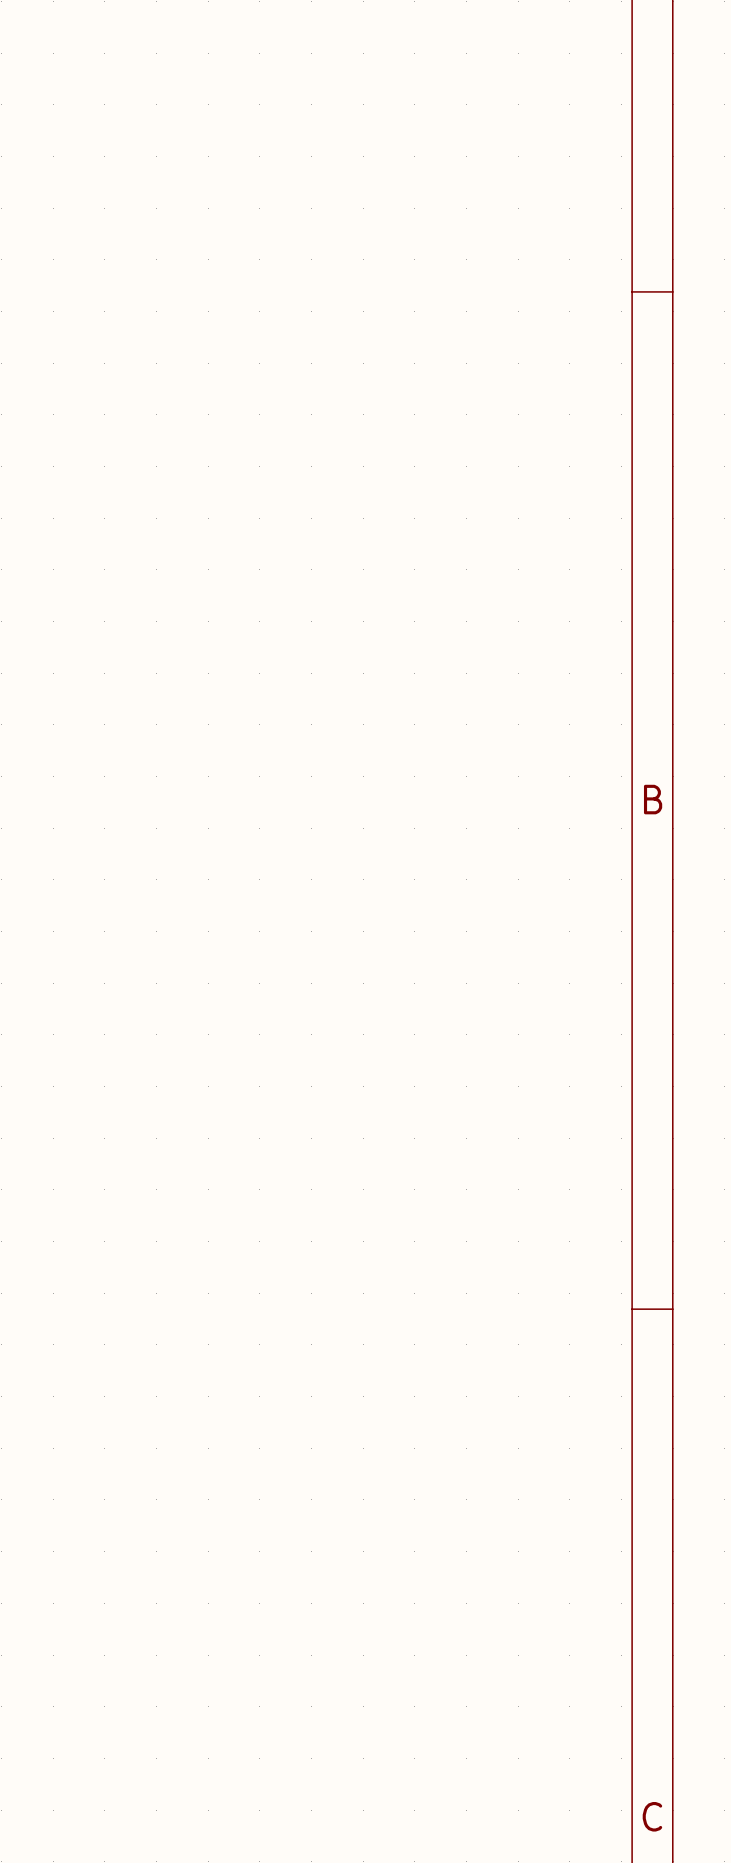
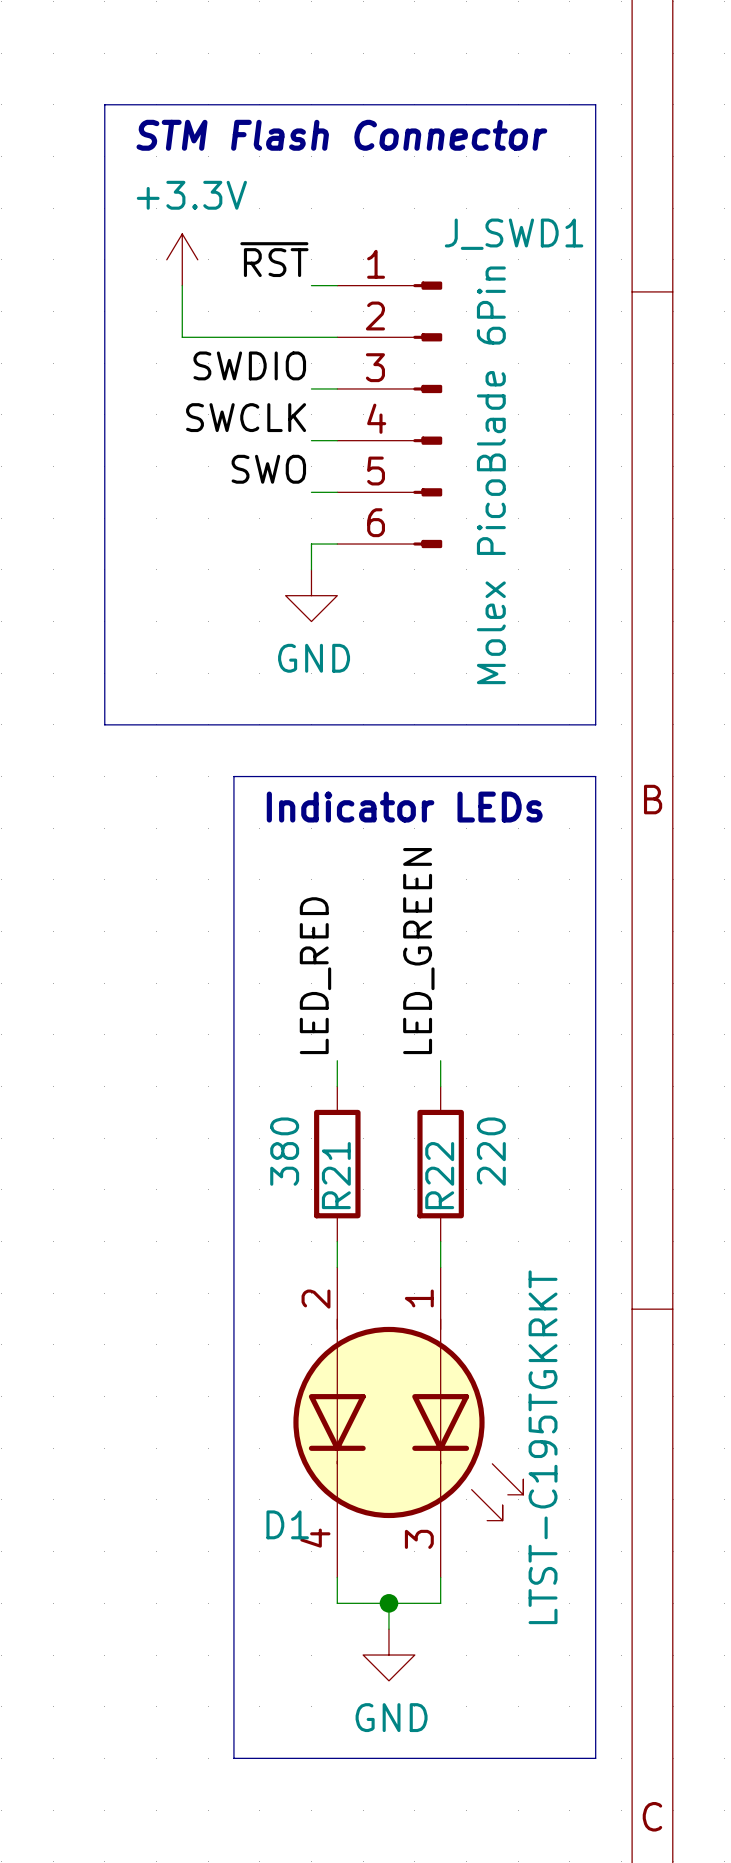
line: none -> (104, 104) (595, 104) (595, 724) (104, 724) (104, 104)
text: none -> STM Flash Connector (341, 135)
power symbol: none -> +3.3V (182, 259)
label: none -> ~{RST} (274, 259)
wire: none -> (182, 285) (182, 337) (337, 337)
wire: none -> (311, 285) (337, 285)
label: none -> SWDIO (249, 365)
wire: none -> (311, 388) (337, 388)
J_SWD1: none -> Molex PicoBlade 6Pin (389, 414)
label: none -> SWCLK (246, 417)
wire: none -> (311, 440) (337, 440)
label: none -> SWO (268, 469)
wire: none -> (311, 492) (337, 492)
wire: none -> (337, 544) (311, 544) (311, 569)
power symbol: none -> GND (311, 595)
line: none -> (233, 776) (595, 776) (595, 1758) (233, 1758) (233, 776)
text: none -> Indicator LEDs (404, 807)
label: none -> LED_GREEN (418, 951)
label: none -> LED_RED (315, 975)
wire: none -> (337, 1060) (337, 1086)
wire: none -> (440, 1060) (440, 1086)
R21: none -> 380 (337, 1164)
R22: none -> 220 (440, 1164)
wire: none -> (337, 1241) (337, 1267)
wire: none -> (440, 1241) (440, 1267)
D1: none -> LTST-C195TGKRKT (408, 1422)
wire: none -> (337, 1577) (337, 1603) (440, 1603) (440, 1577)
wire: none -> (388, 1603) (388, 1629)
junction: none -> (388, 1603)
power symbol: none -> GND (388, 1655)

